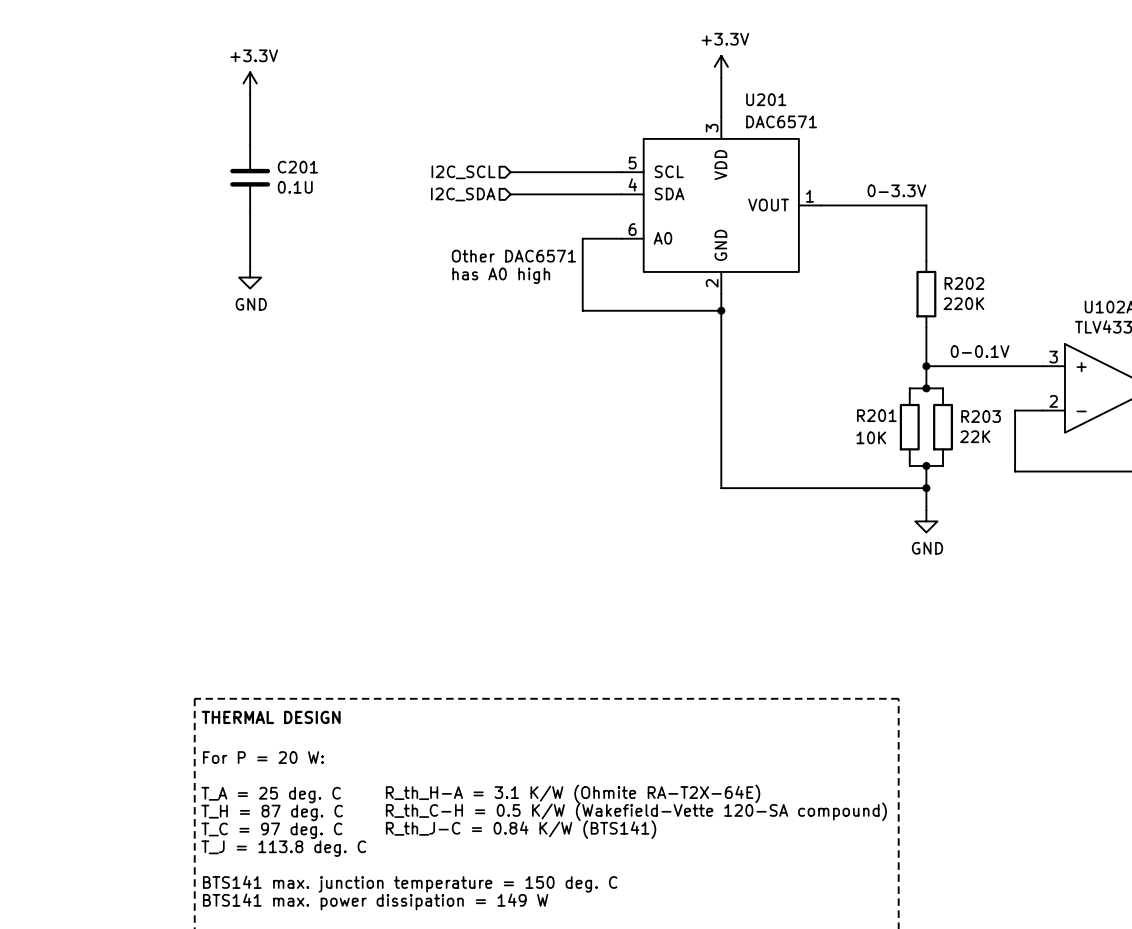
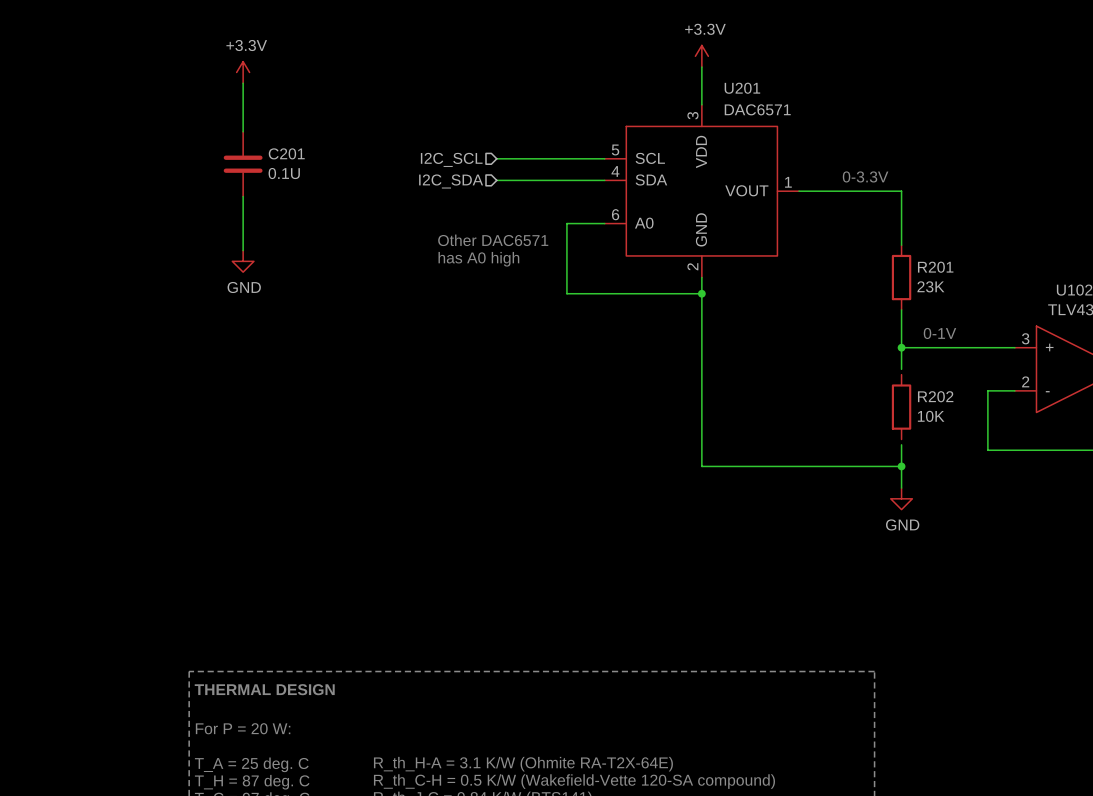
R202 name: R202 (964, 283) -> R201 (935, 267)
R202 value: 220K (963, 303) -> 23K (930, 286)
text: 0-0.1V (980, 351) -> 0-1V (939, 333)
junction: (926, 388) -> none
wire: (909, 393) (909, 388) (943, 388) (943, 393) -> none
R201: 10K (909, 427) -> none
R202: none -> 10K (901, 407)
R203: 22K (943, 427) -> none
wire: (909, 460) (909, 465) (943, 465) (943, 460) -> none
junction: (926, 465) -> none

